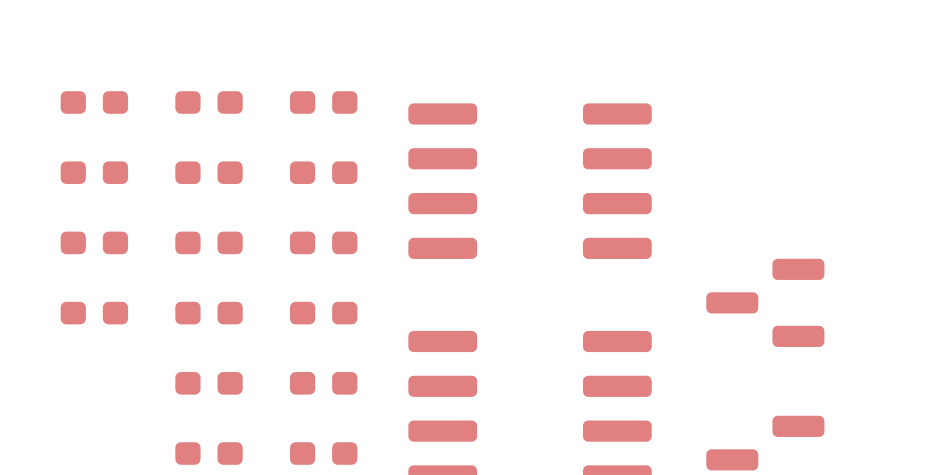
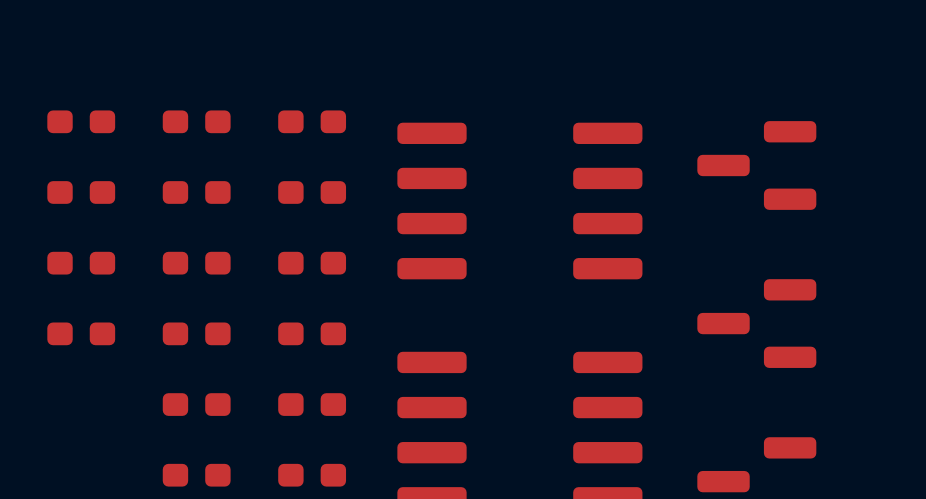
part: none -> (756, 165)

